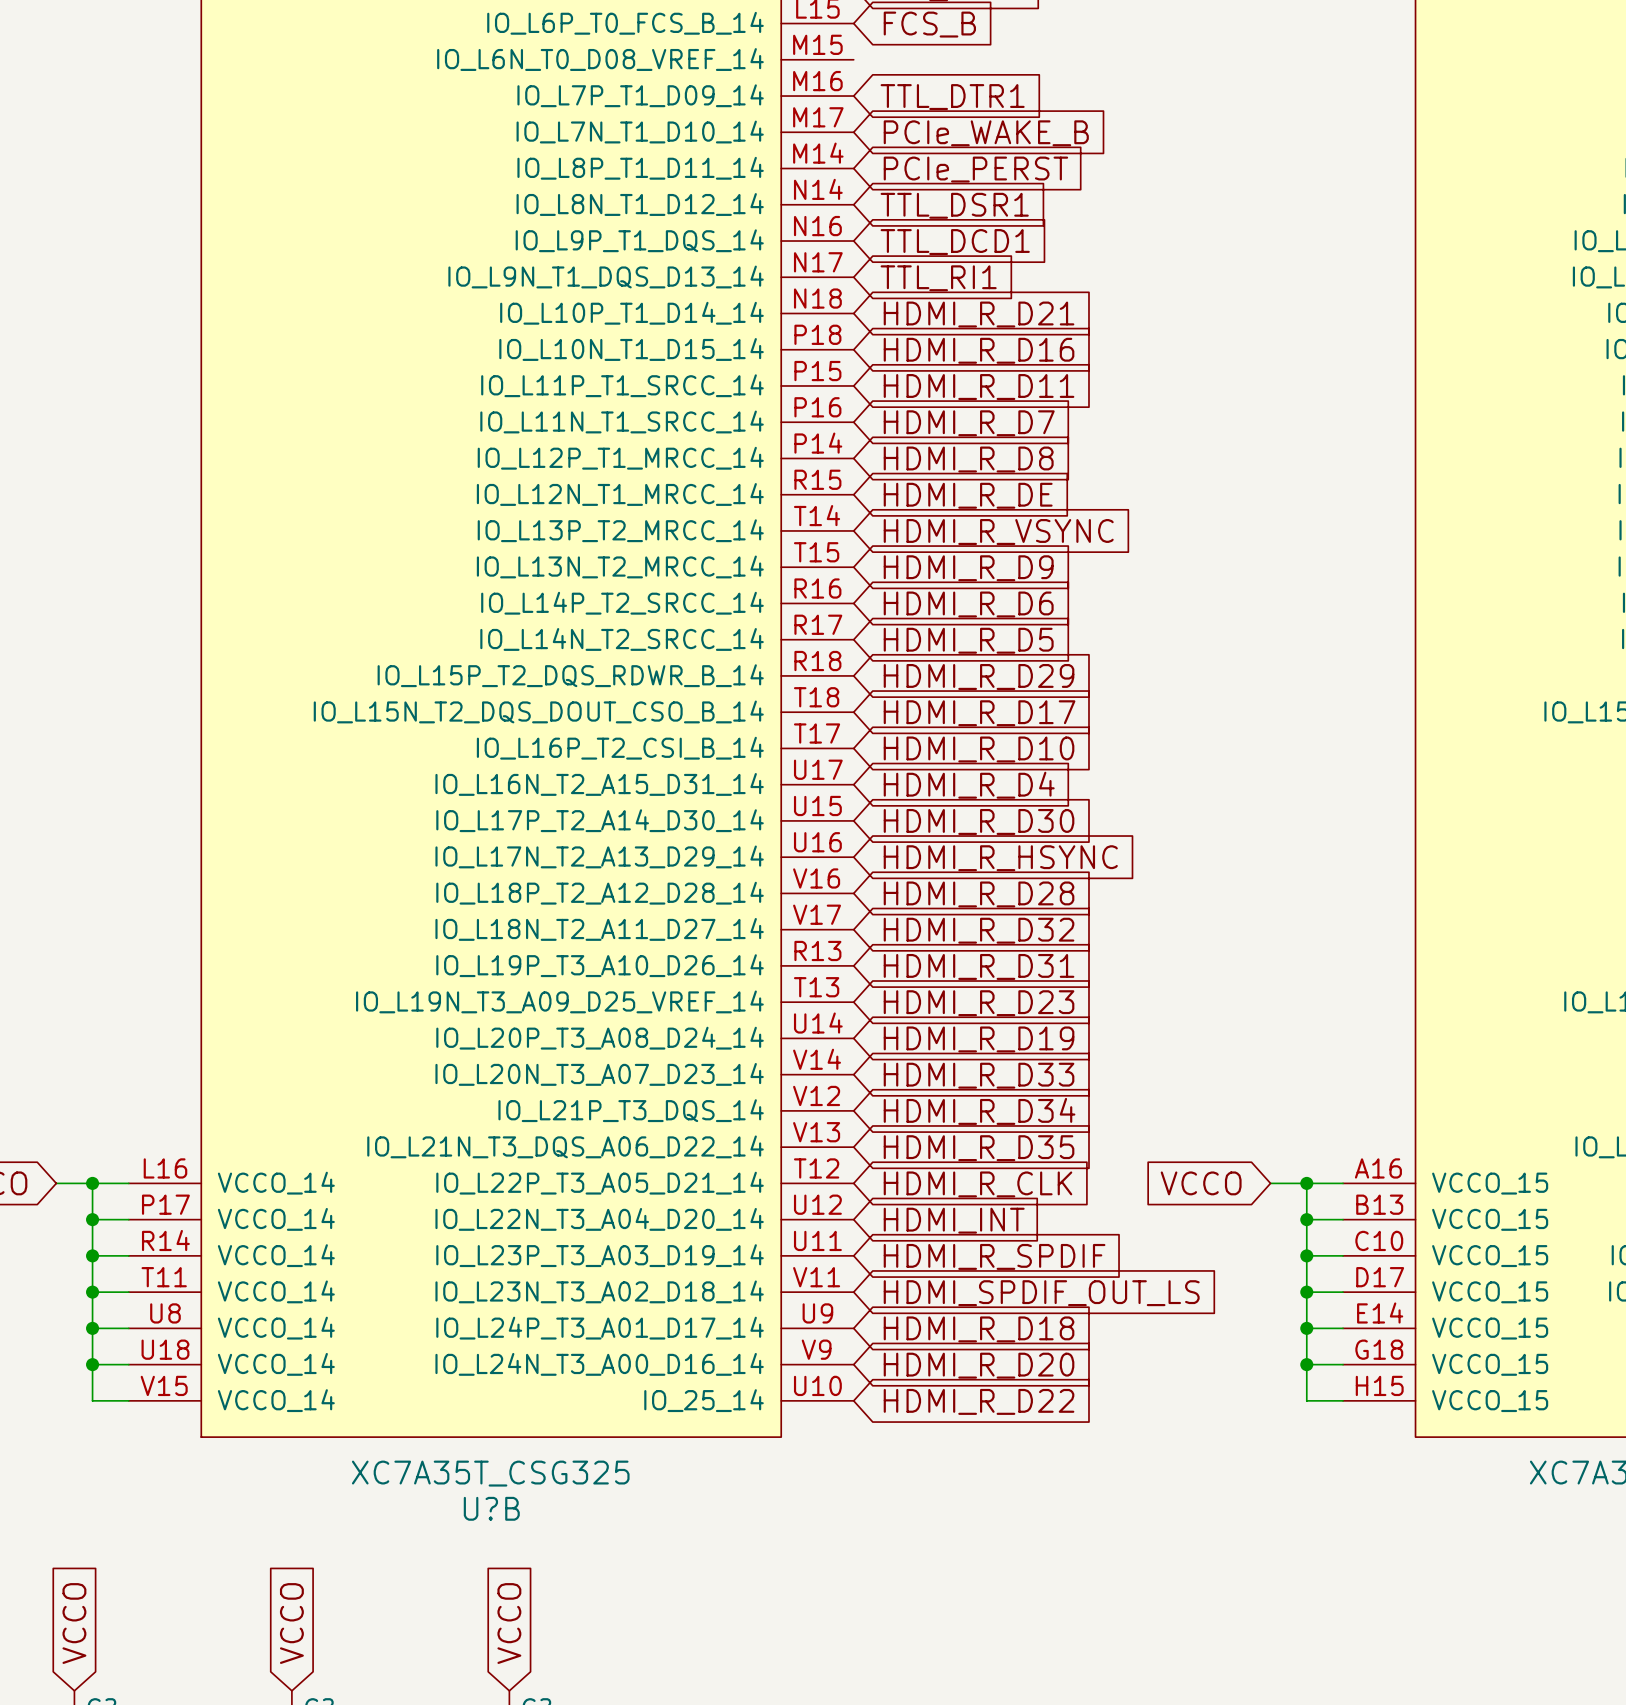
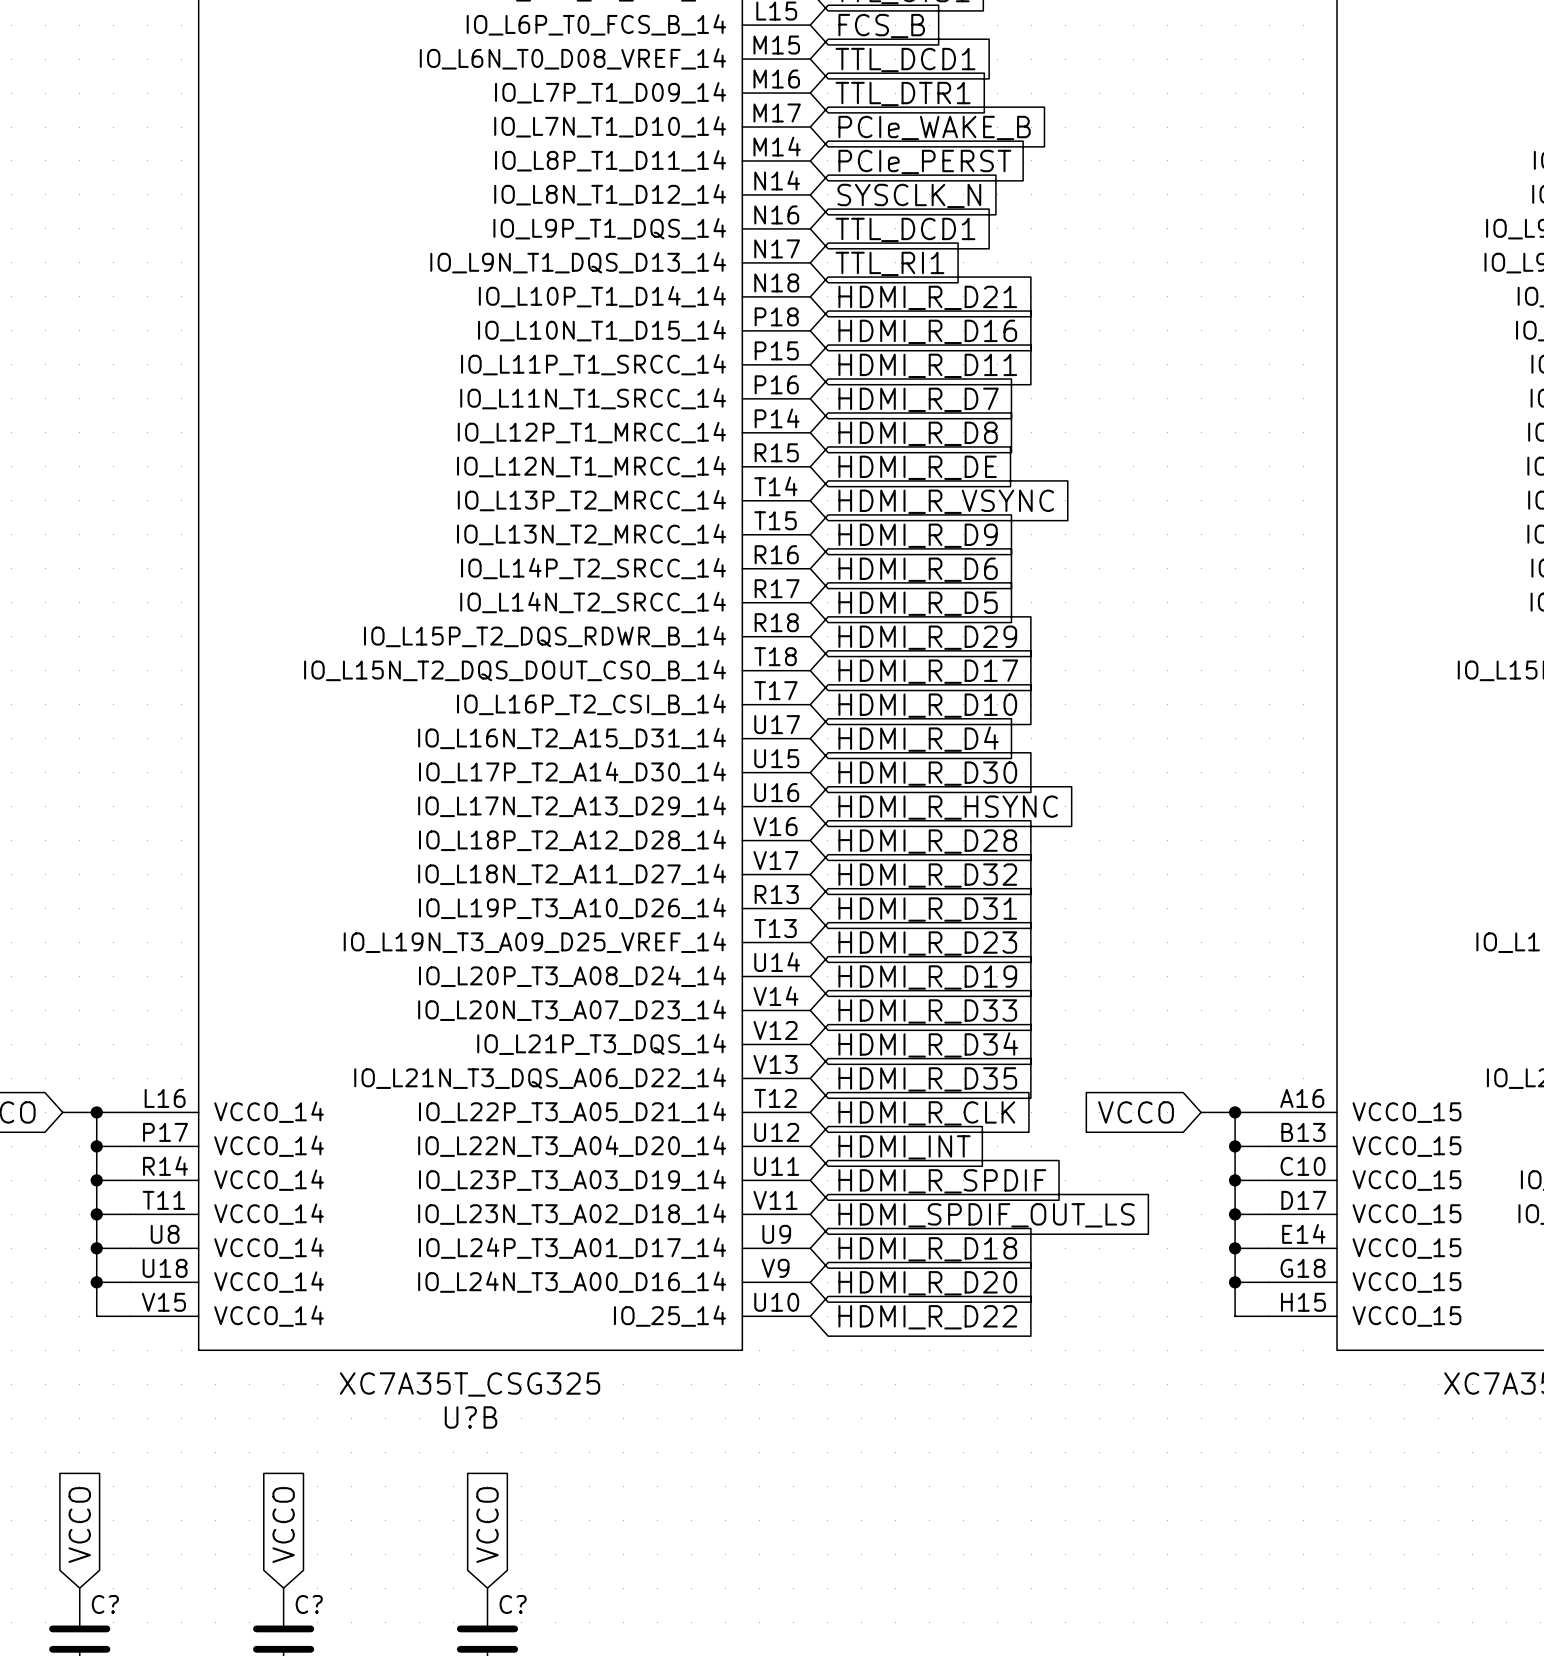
global label: none -> TTL_DCD1 (905, 60)
global label: TTL_DSR1 (954, 205) -> SYSCLK_N (909, 195)

